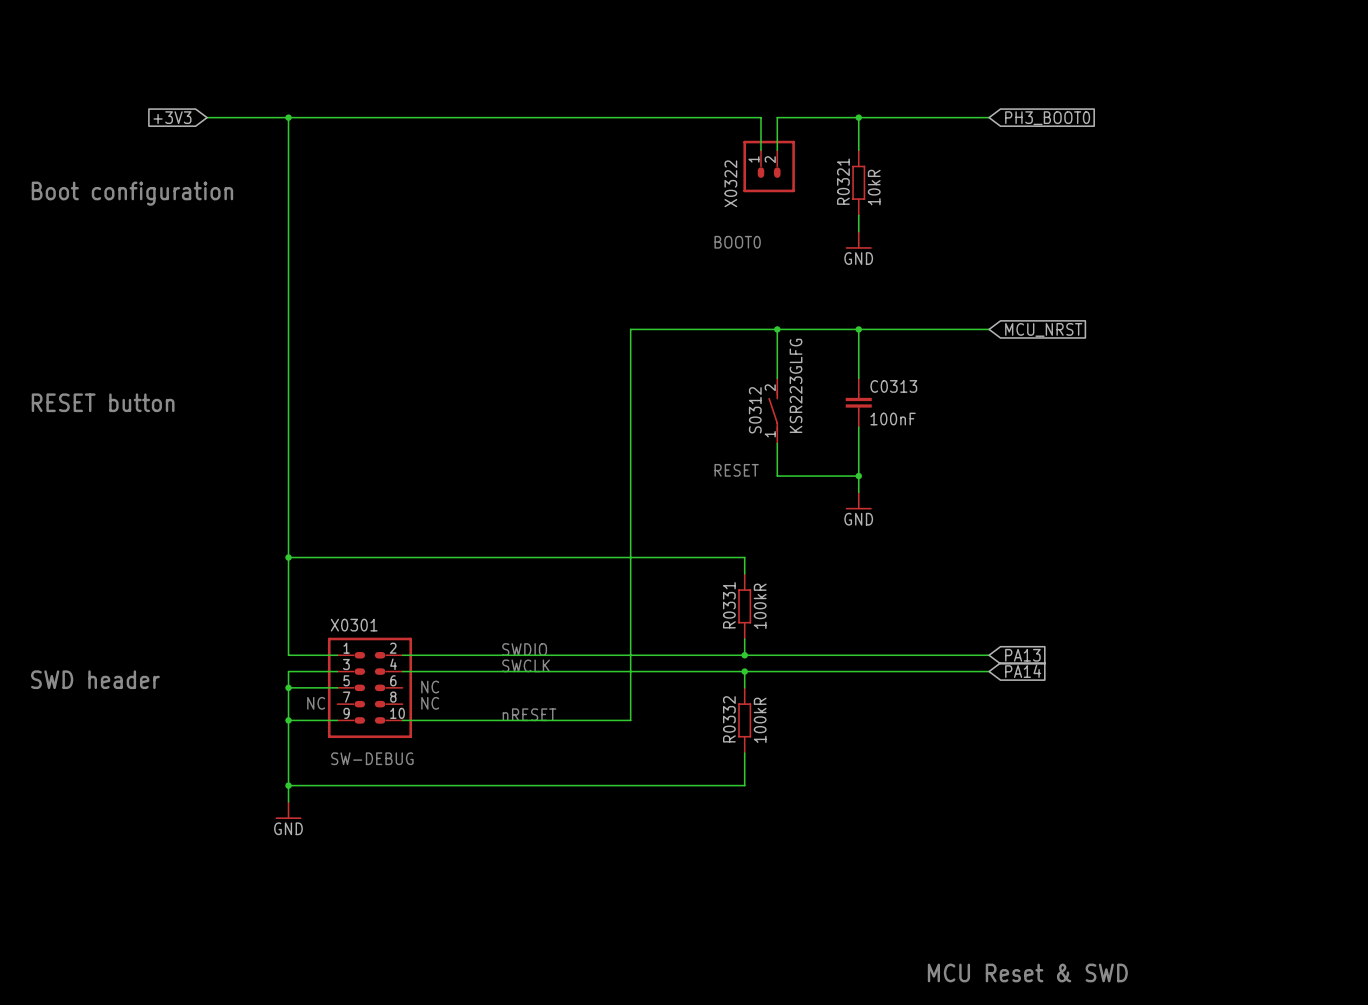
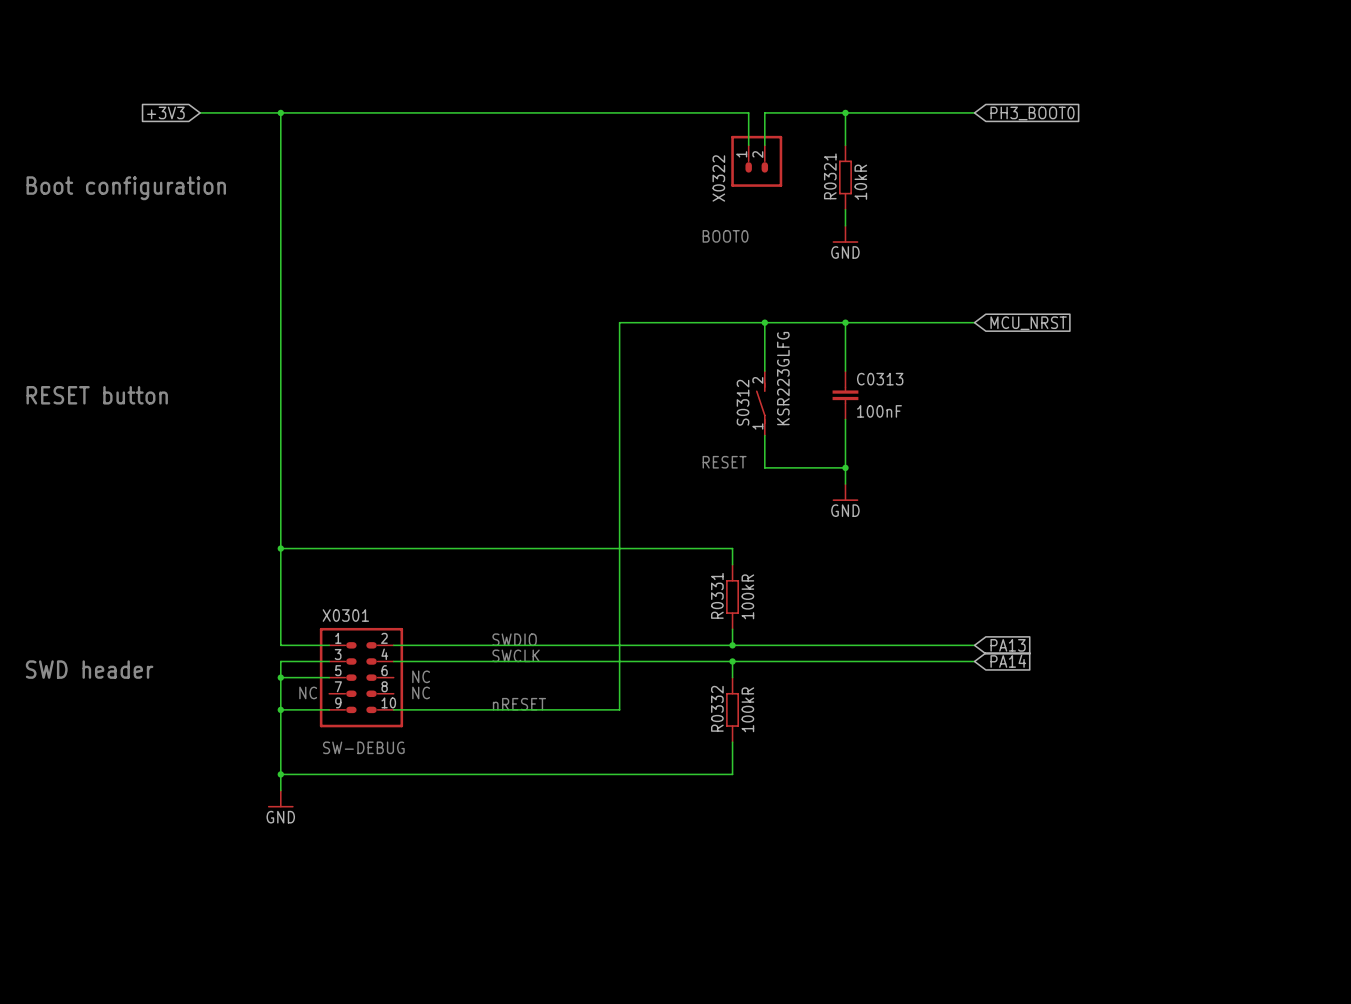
text: MCU Reset & SWD (1027, 972) -> none

